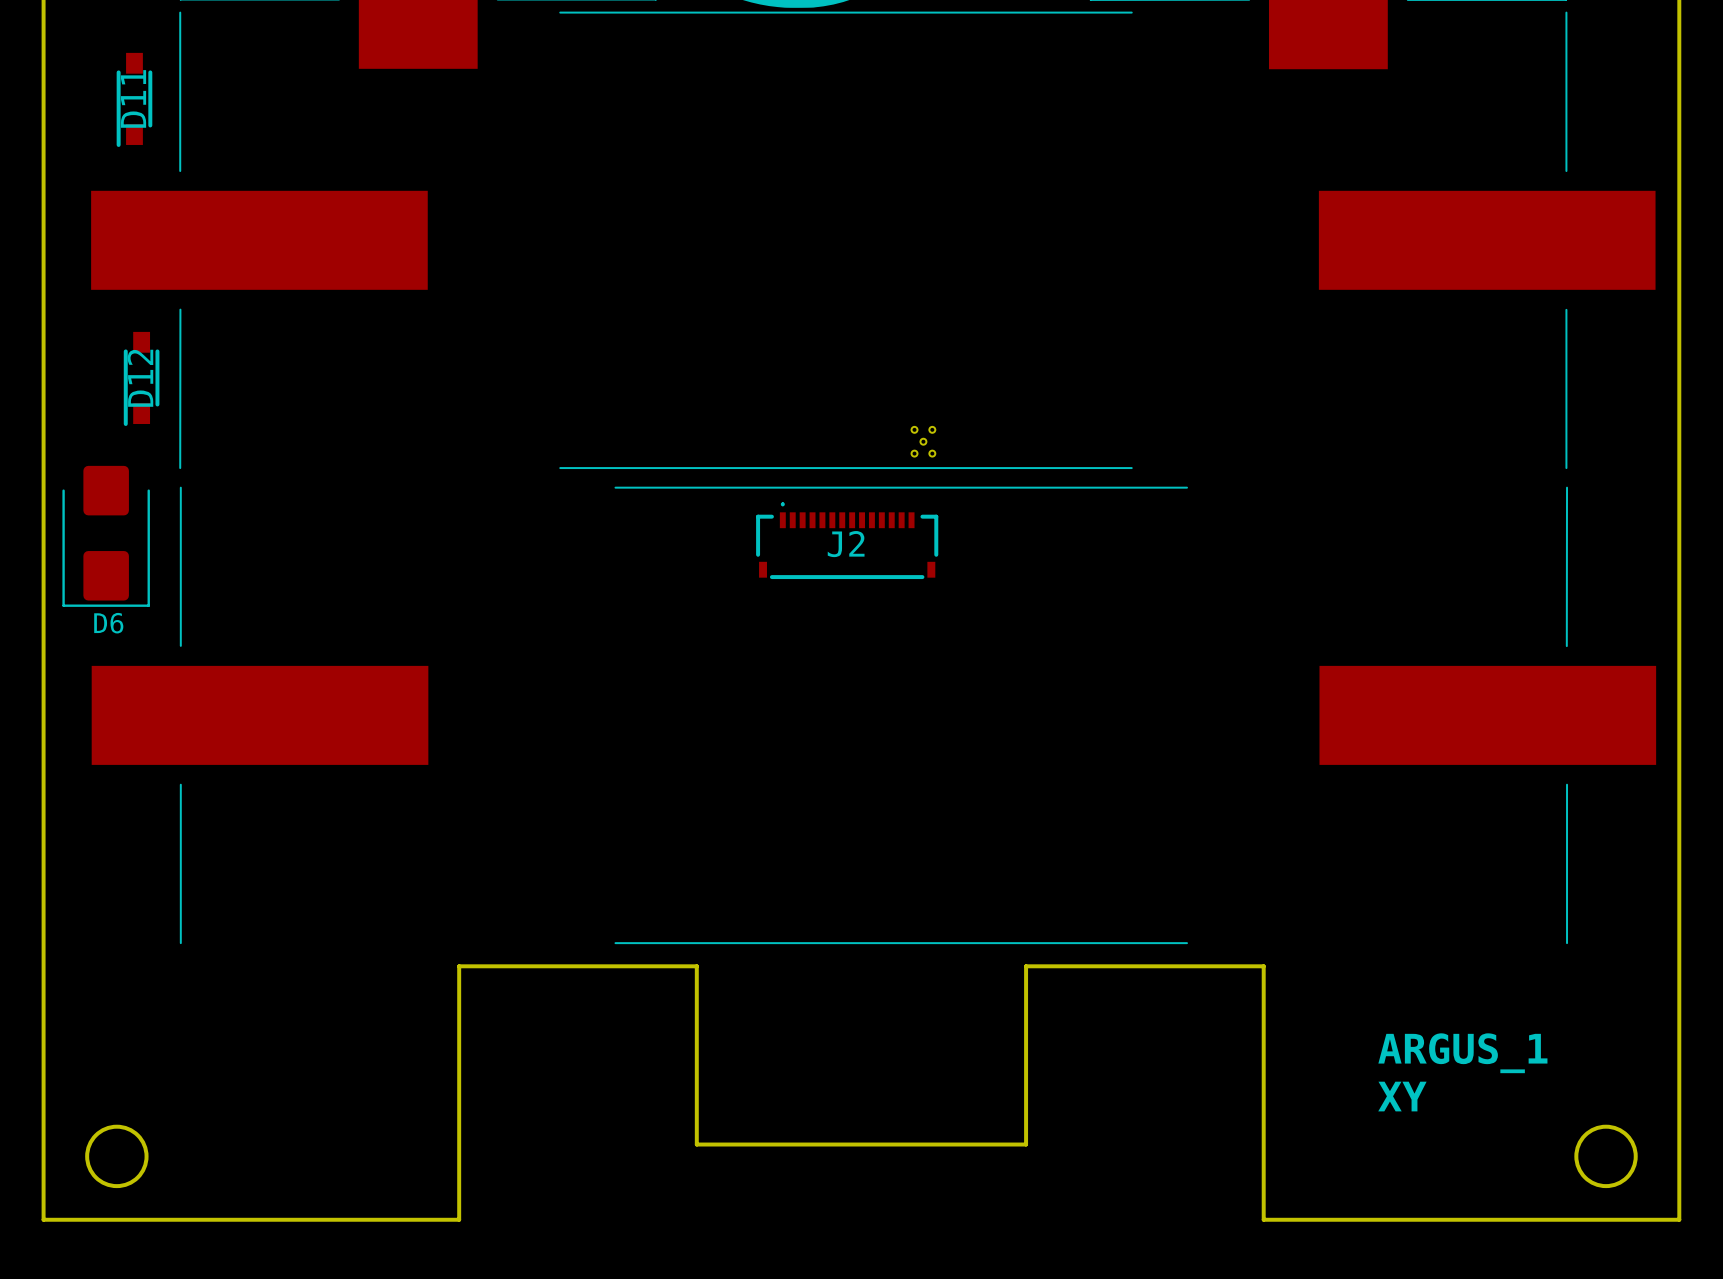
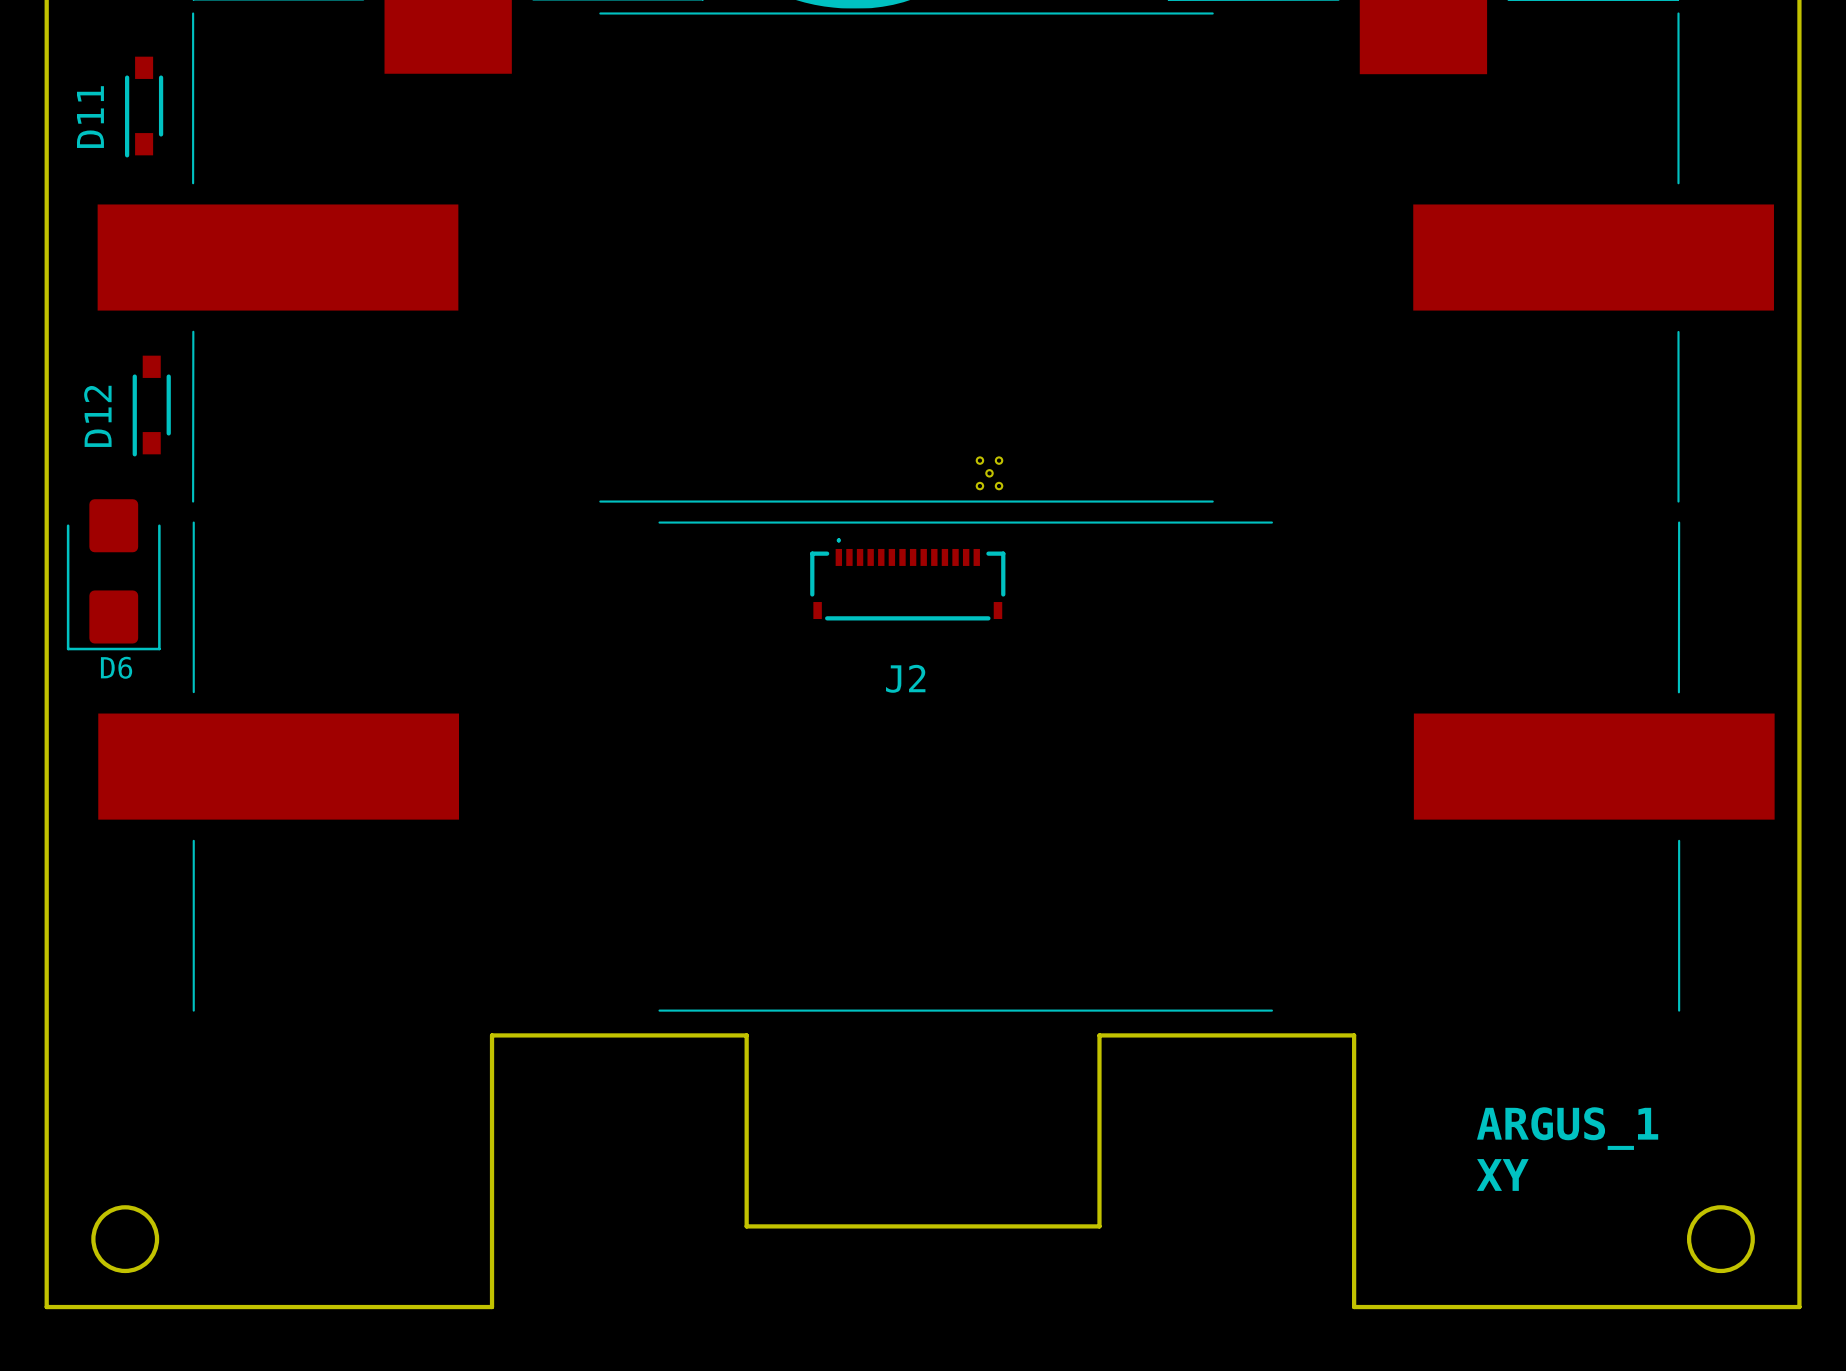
D11 name position: D11 (133, 98) -> D11 (90, 117)
D12 name position: D12 (140, 378) -> D12 (97, 416)
J2 name position: J2 (846, 544) -> J2 (905, 678)

